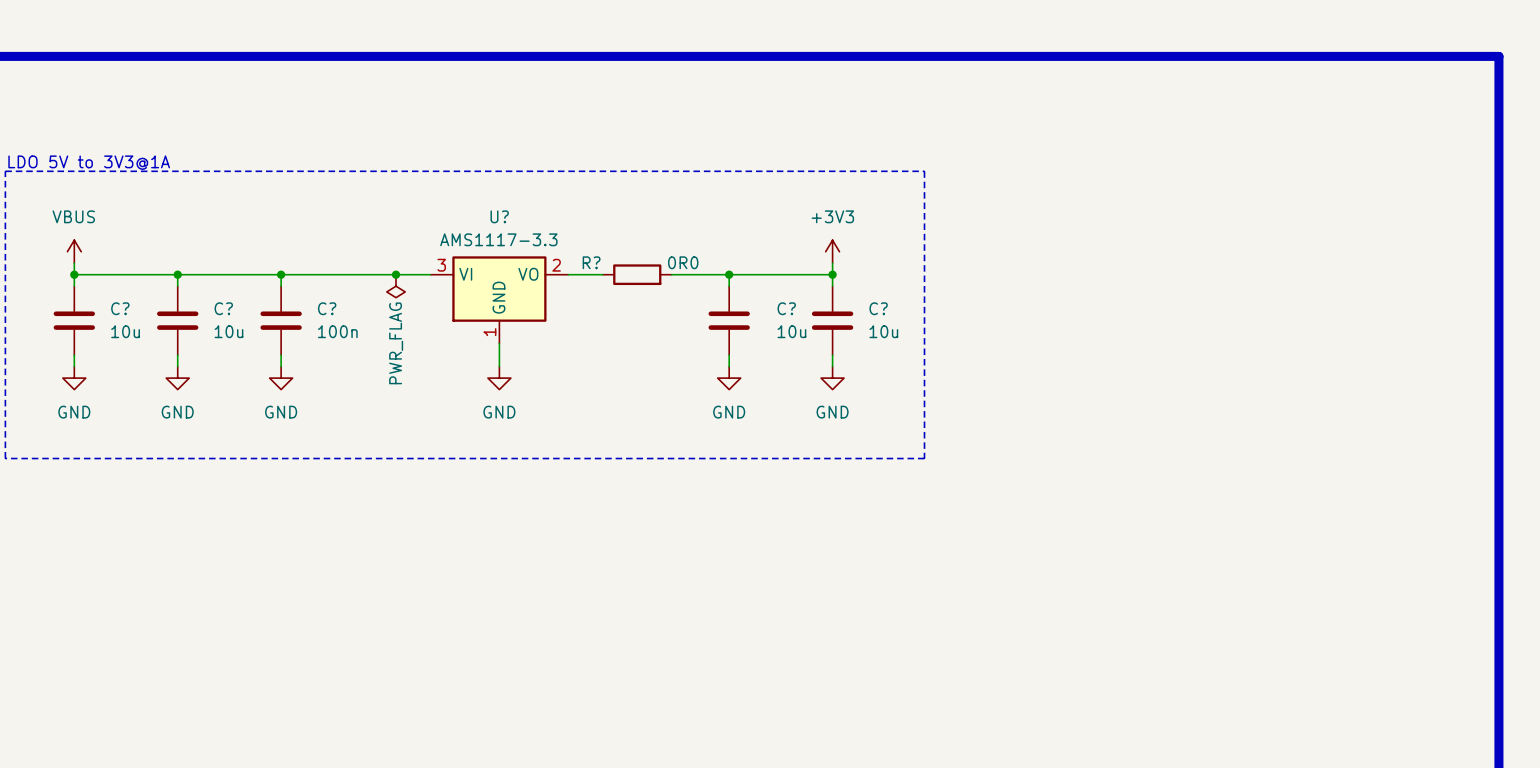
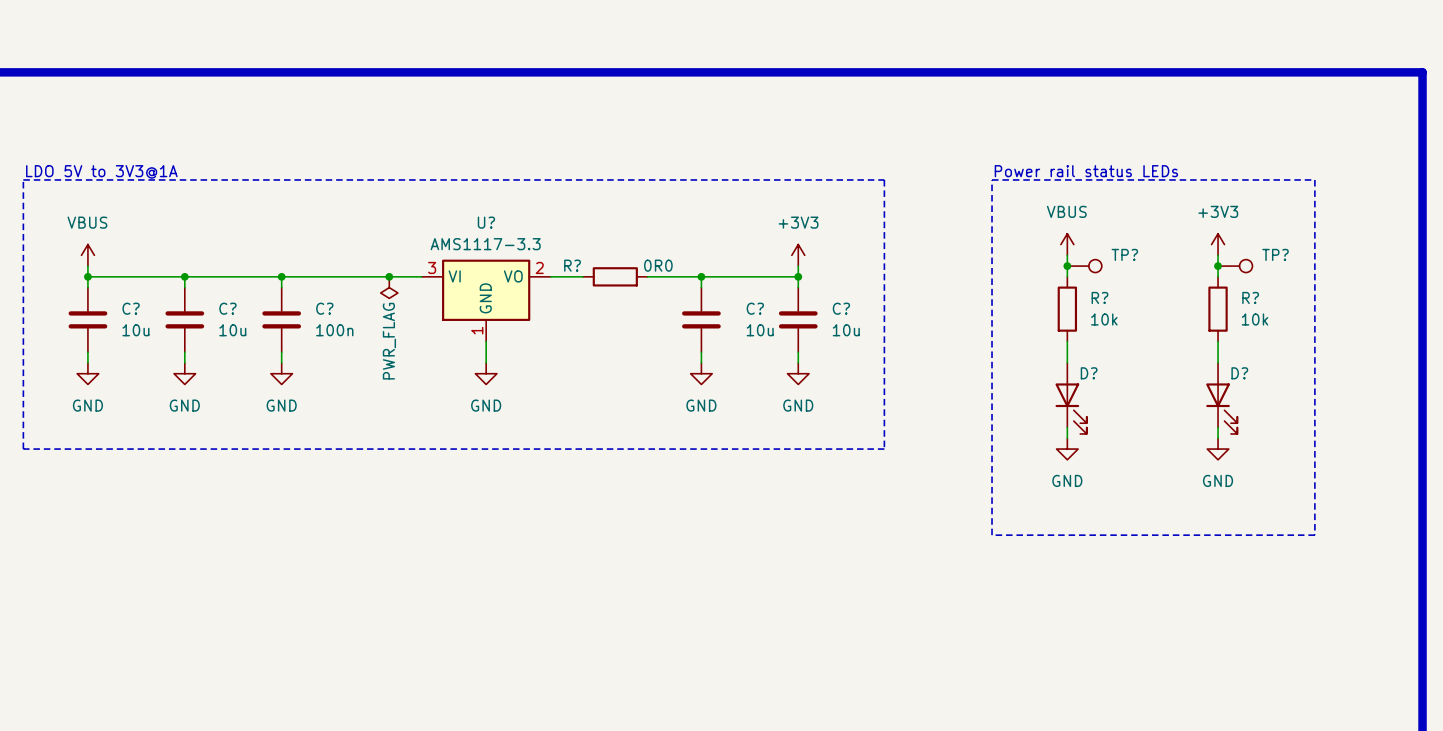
text: none -> Power rail status LEDs (1086, 171)
line: none -> (992, 179) (1314, 179) (1314, 535) (992, 535) (992, 179)
power symbol: none -> VBUS (1067, 244)
power symbol: none -> +3V3 (1218, 244)
wire: none -> (1067, 255) (1067, 276)
wire: none -> (1218, 255) (1218, 276)
junction: none -> (1067, 266)
TP?: none -> (1084, 266)
junction: none -> (1218, 266)
TP?: none -> (1235, 266)
R?: none -> 10k (1067, 309)
R?: none -> 10k (1218, 309)
wire: none -> (1067, 341) (1067, 362)
wire: none -> (1218, 341) (1218, 362)
D?: none -> (1071, 398)
D?: none -> (1221, 398)
wire: none -> (1067, 427) (1067, 438)
wire: none -> (1218, 427) (1218, 438)
power symbol: none -> GND (1067, 449)
power symbol: none -> GND (1218, 449)

